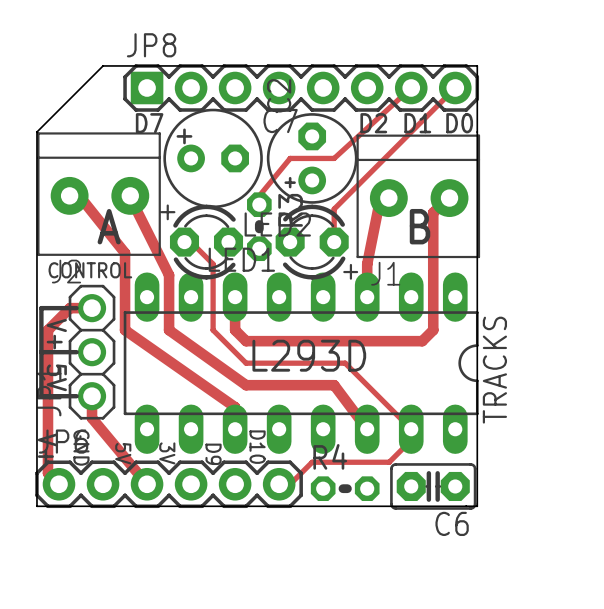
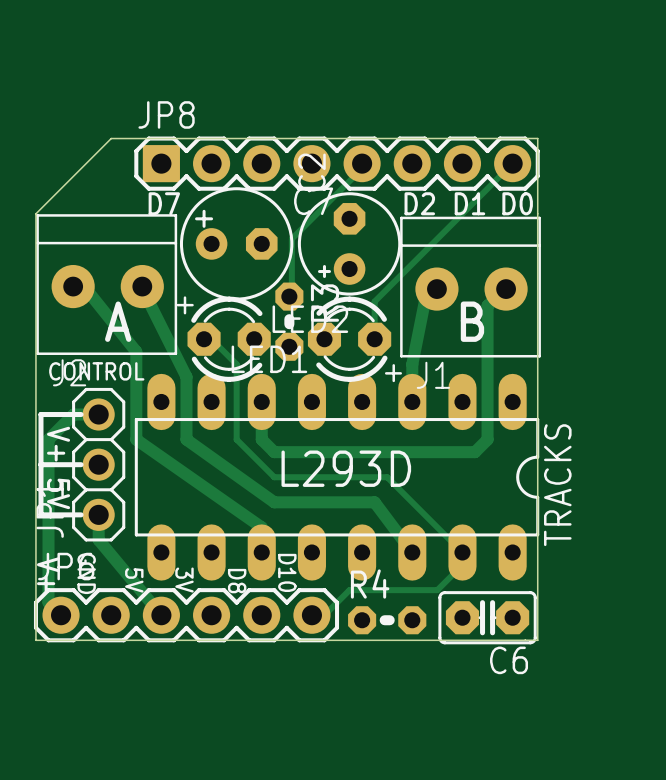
track: (411, 87) (334, 158) (290, 158) (259, 195) (259, 204) -> (362, 163) (362, 168) (291, 238) (291, 294) (289, 296)
text: D9 (213, 454) -> D8 (237, 581)

